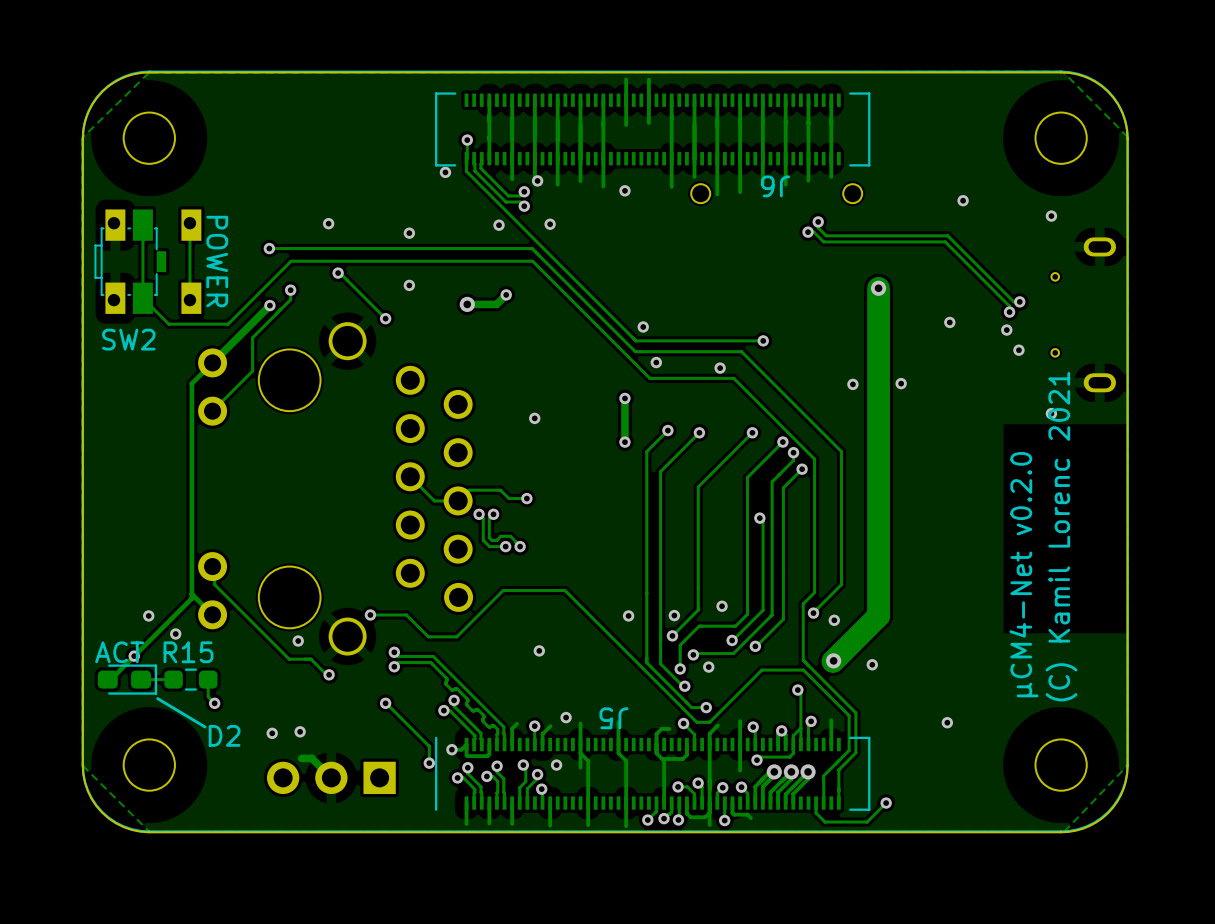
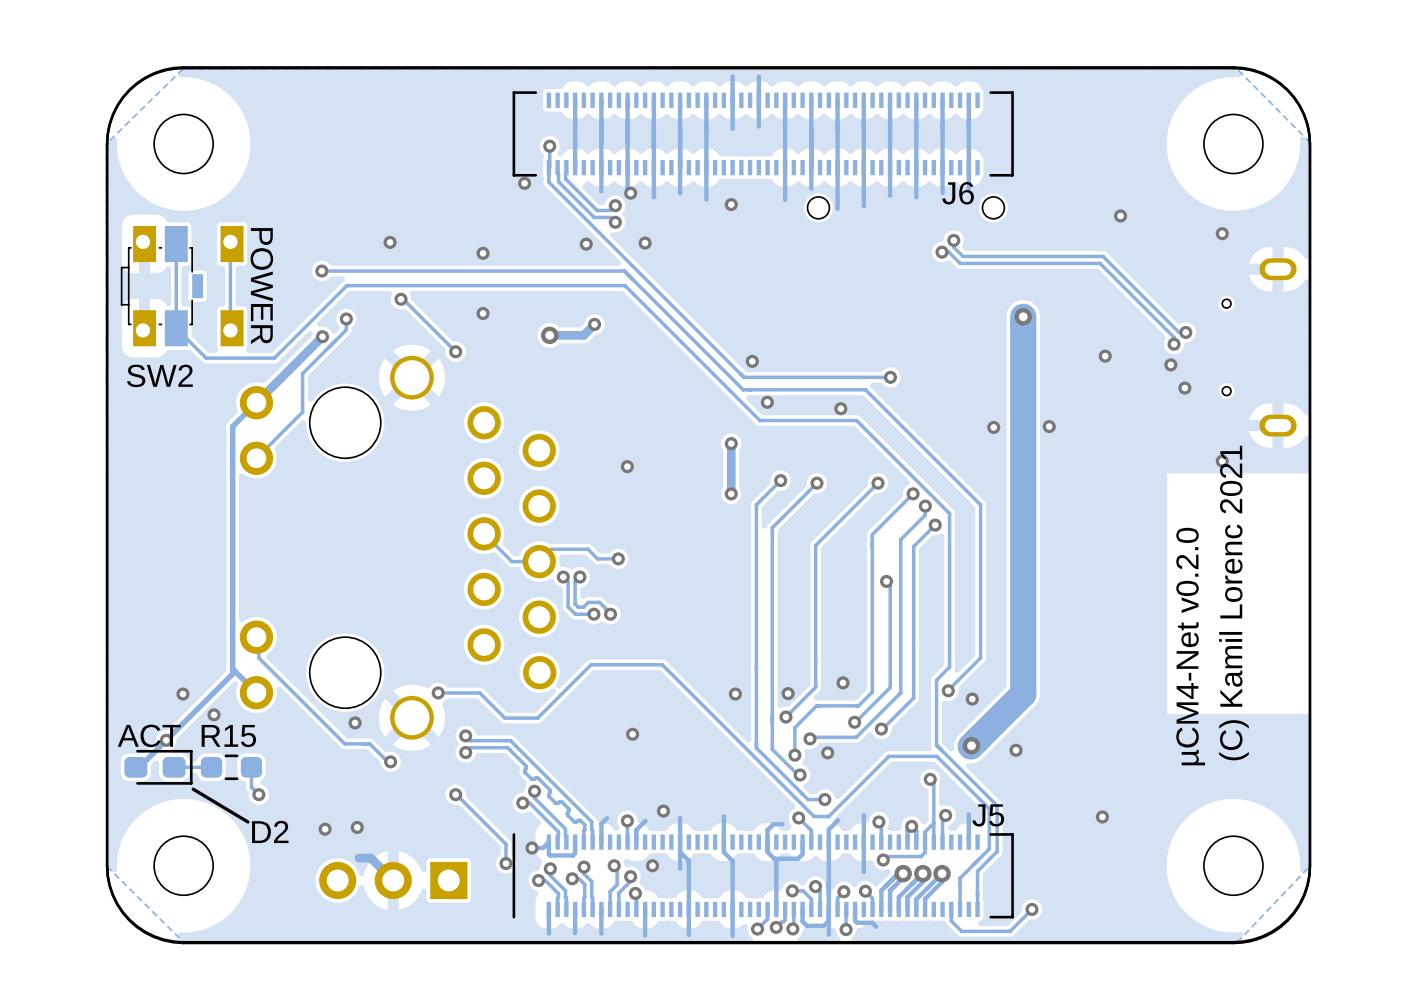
J6 position: (775, 186) -> (958, 193)
J6 name rotation: 0° (775, 186) -> 180° (958, 193)
J5 position: (614, 718) -> (988, 815)
J5 name rotation: 0° (614, 718) -> 180° (988, 815)

